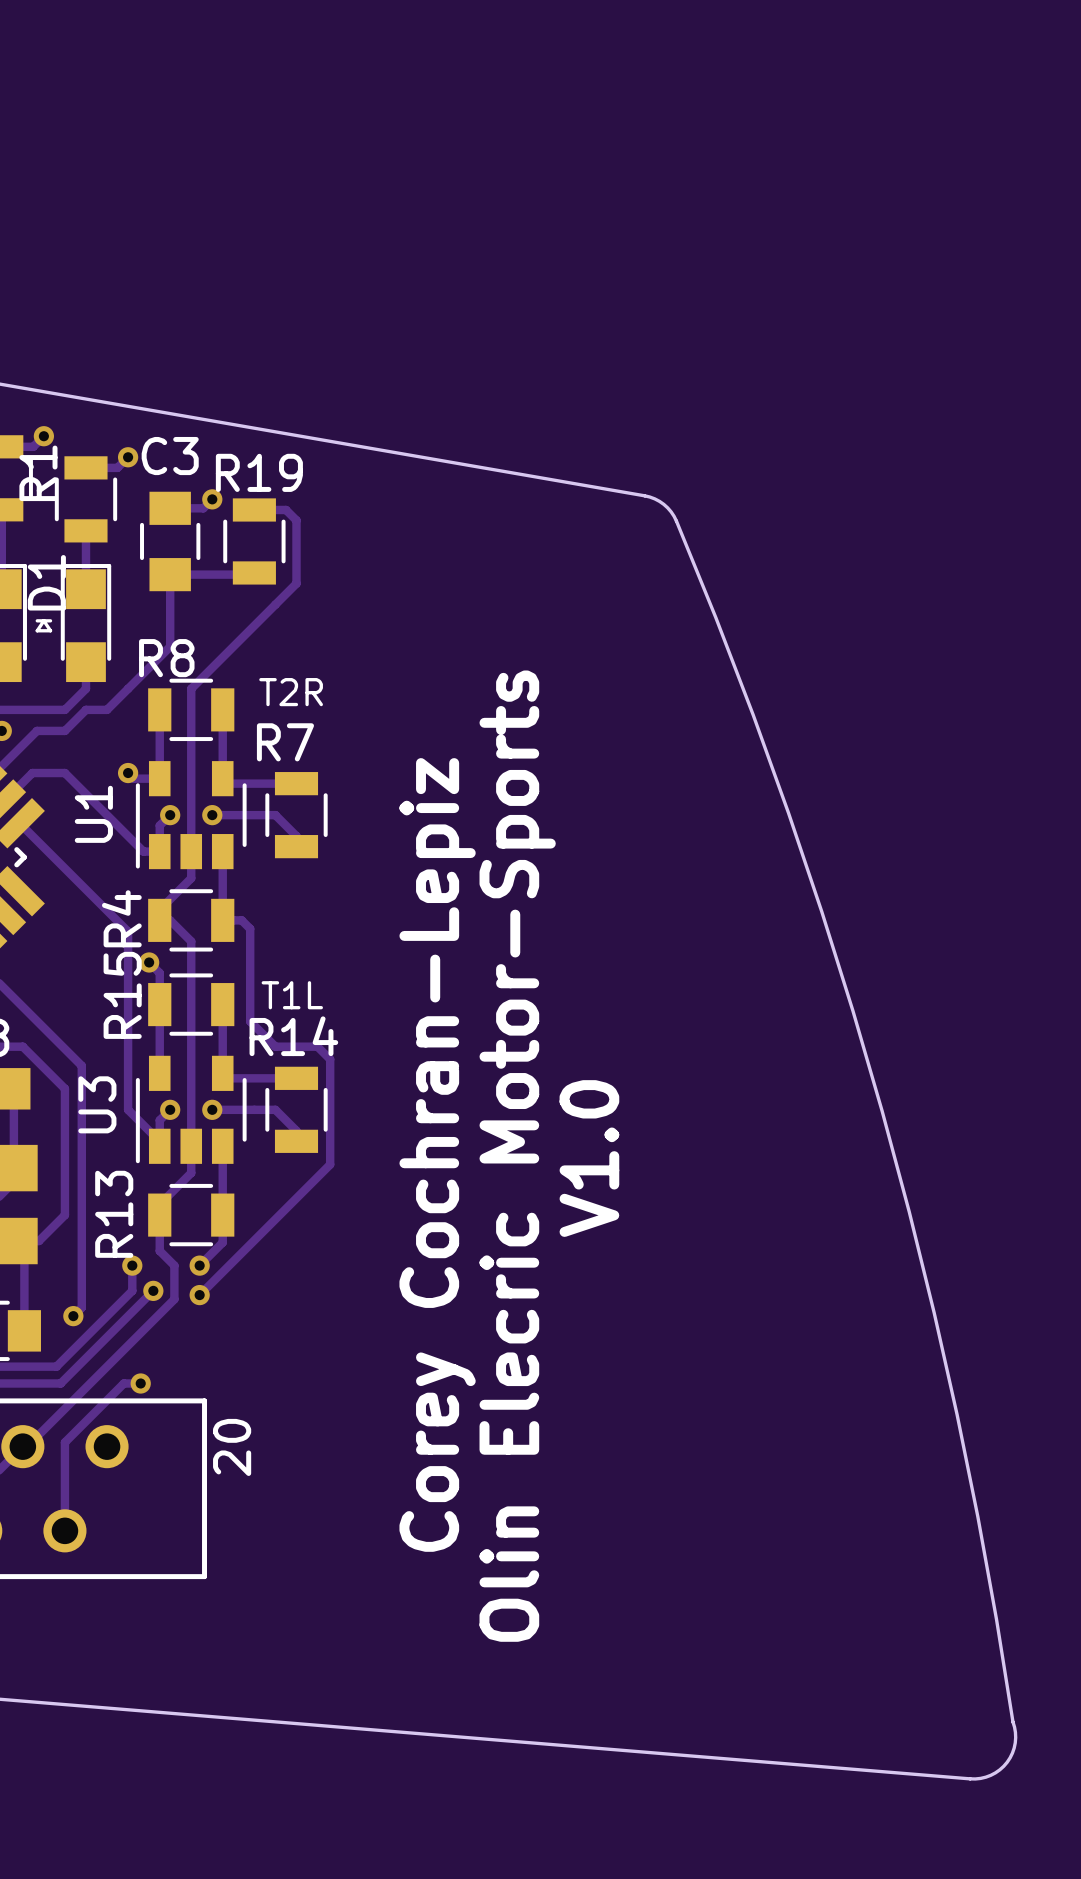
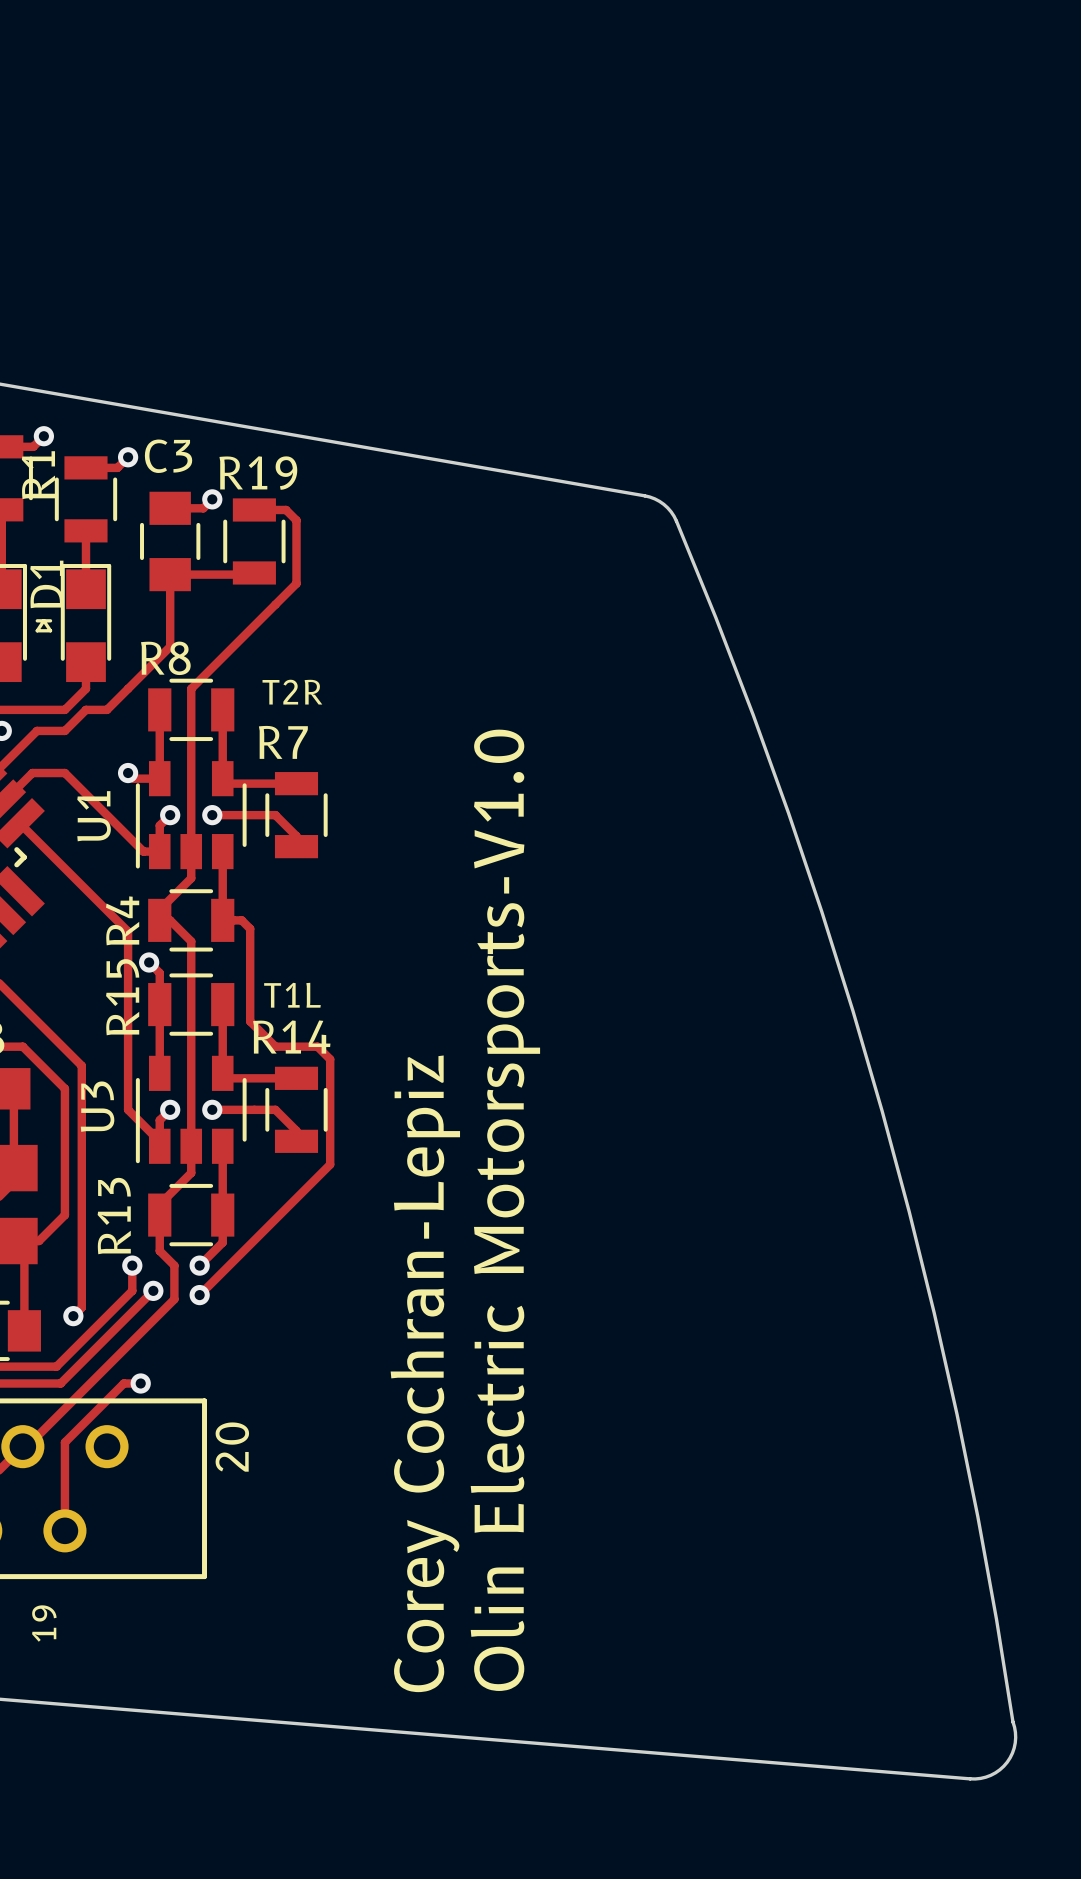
text position: Corey Cochran-Lepiz (437, 1154) -> Corey Cochran-Lepiz (425, 1373)
text: Olin Elecric Motor-Sports (517, 1156) -> Olin Electric Motorsports-V1.0 (505, 1210)
text: V1.0 (589, 1158) -> none
text: none -> 19 (44, 1623)

